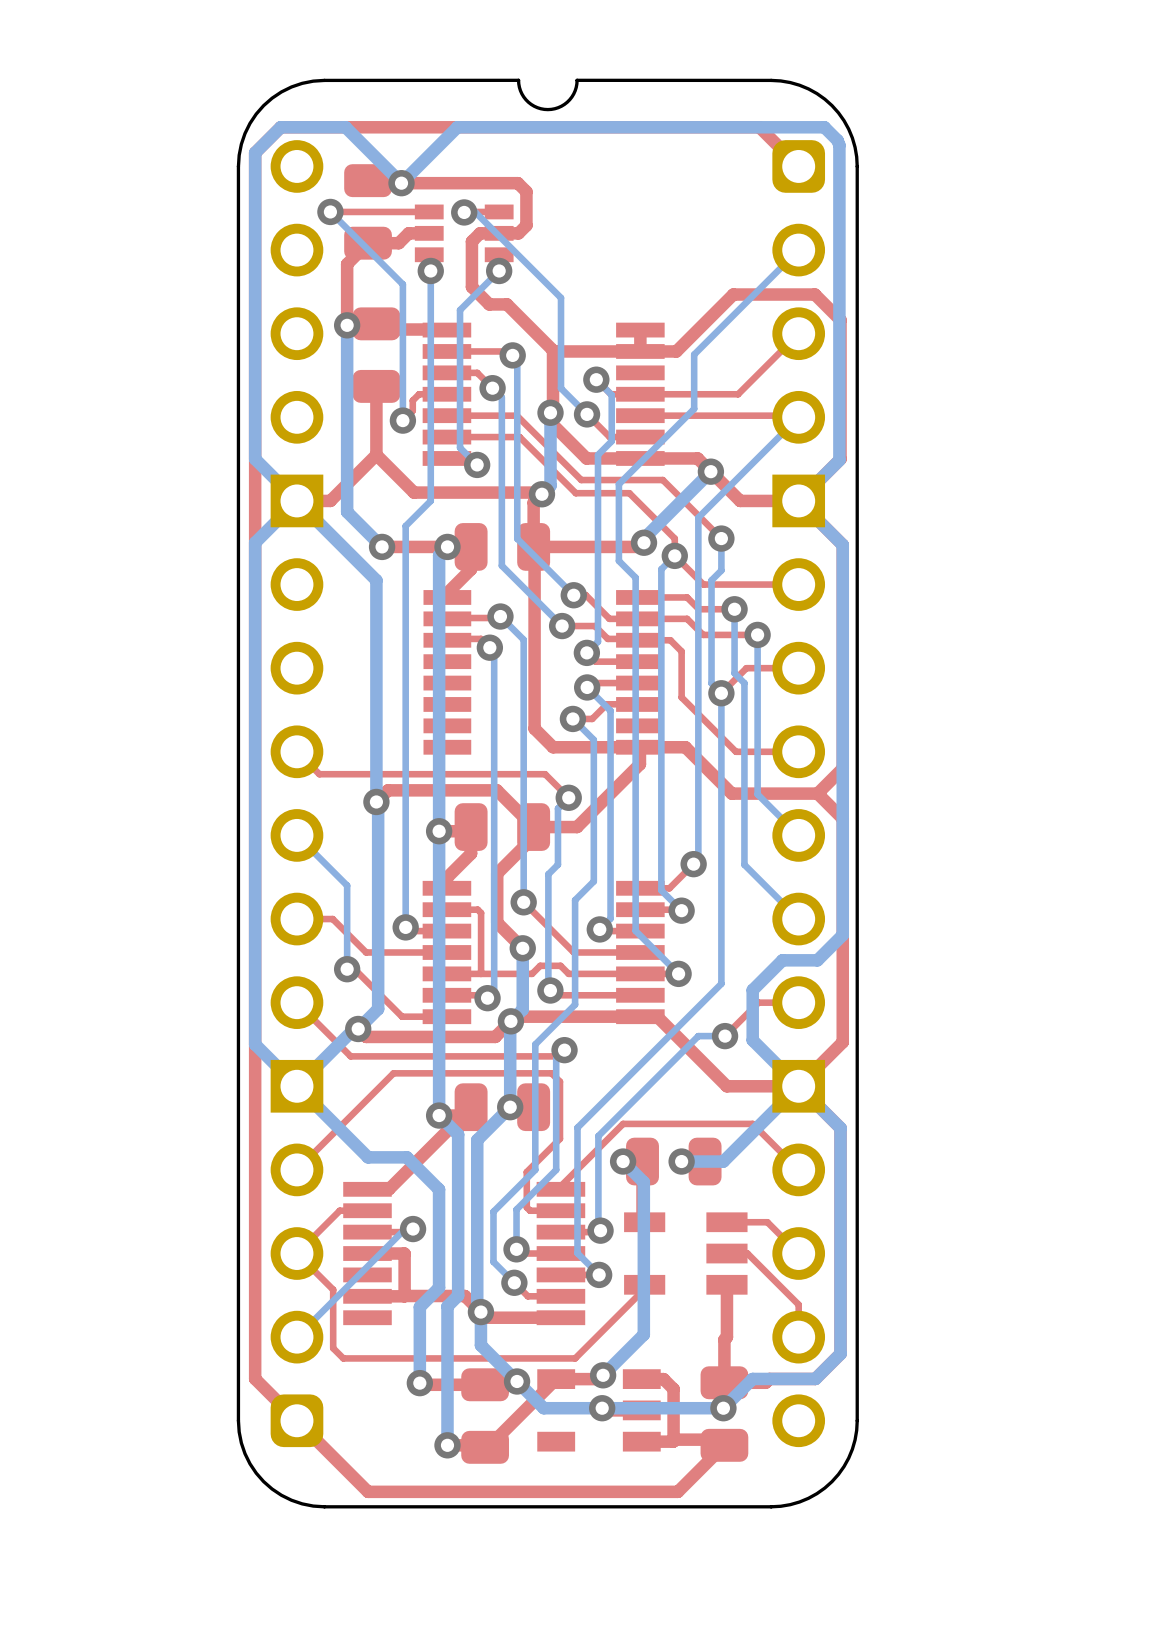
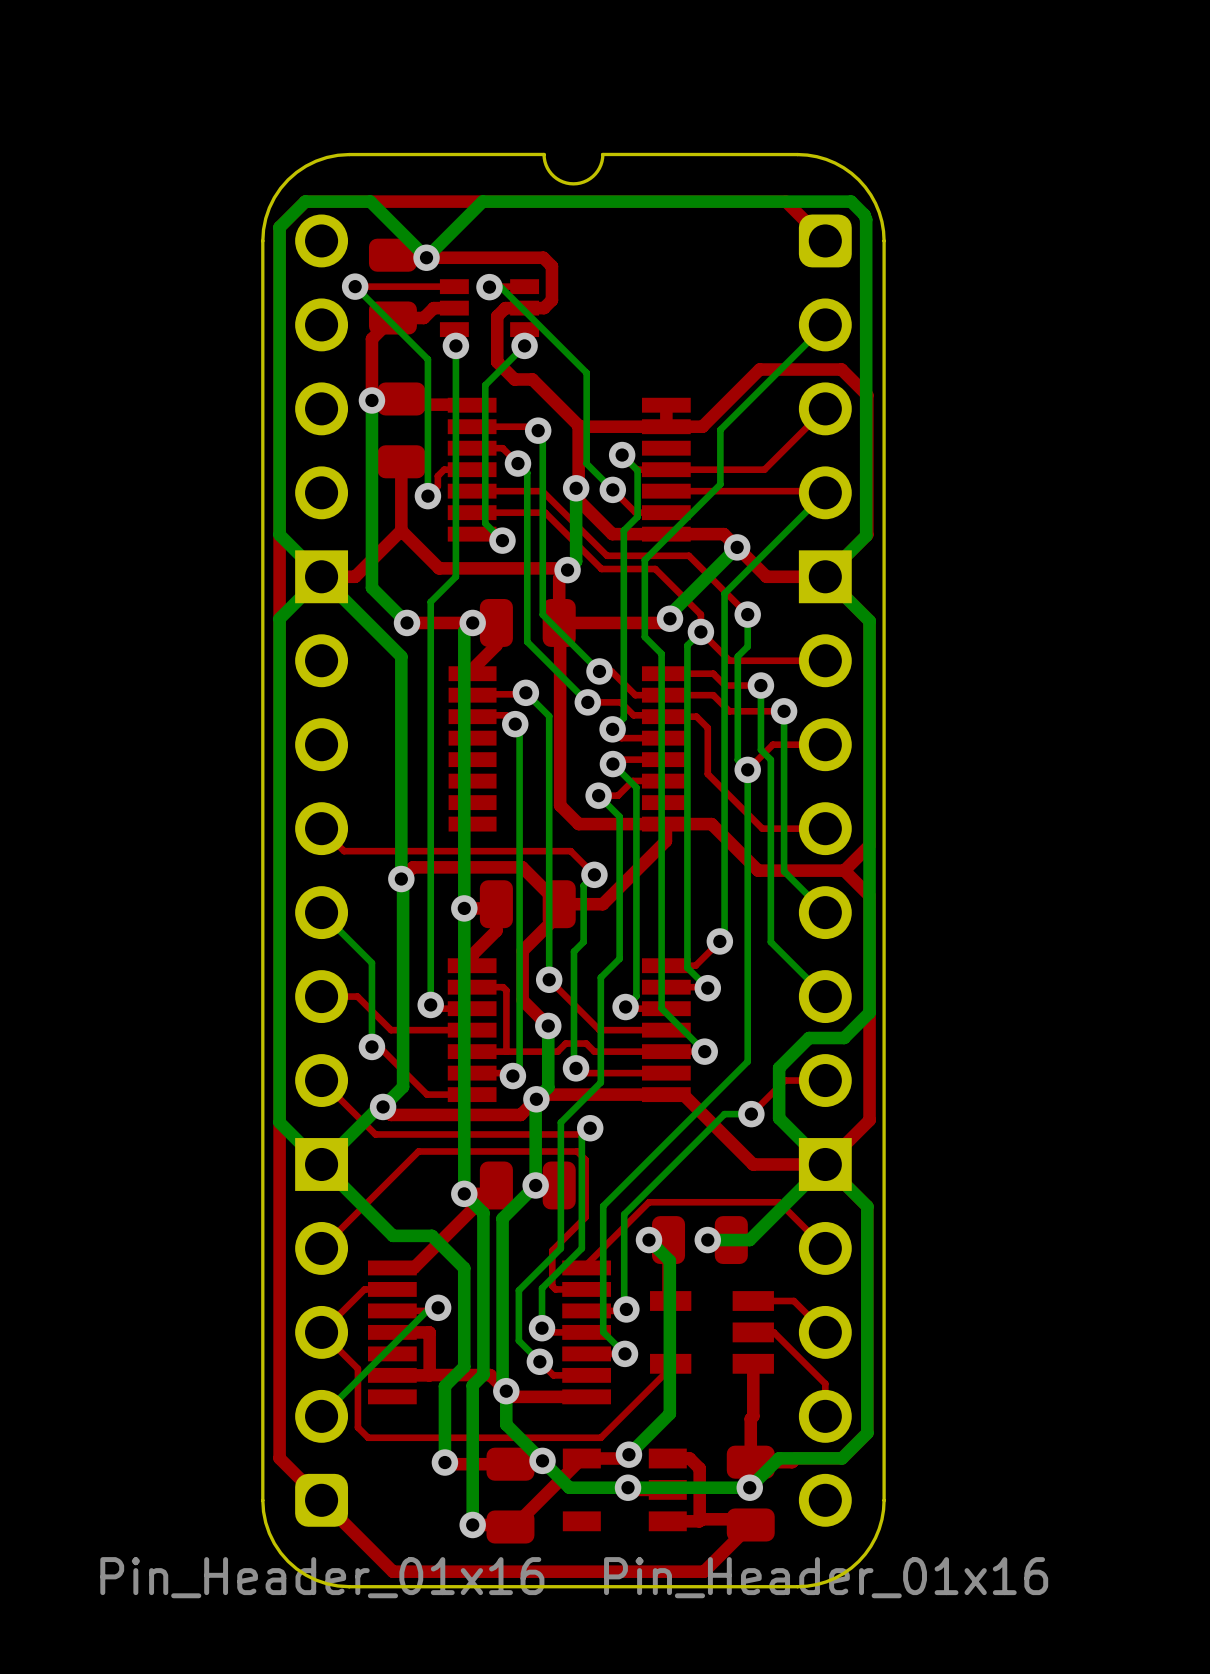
drawing: none -> [100, 1557, 1049, 1599]

